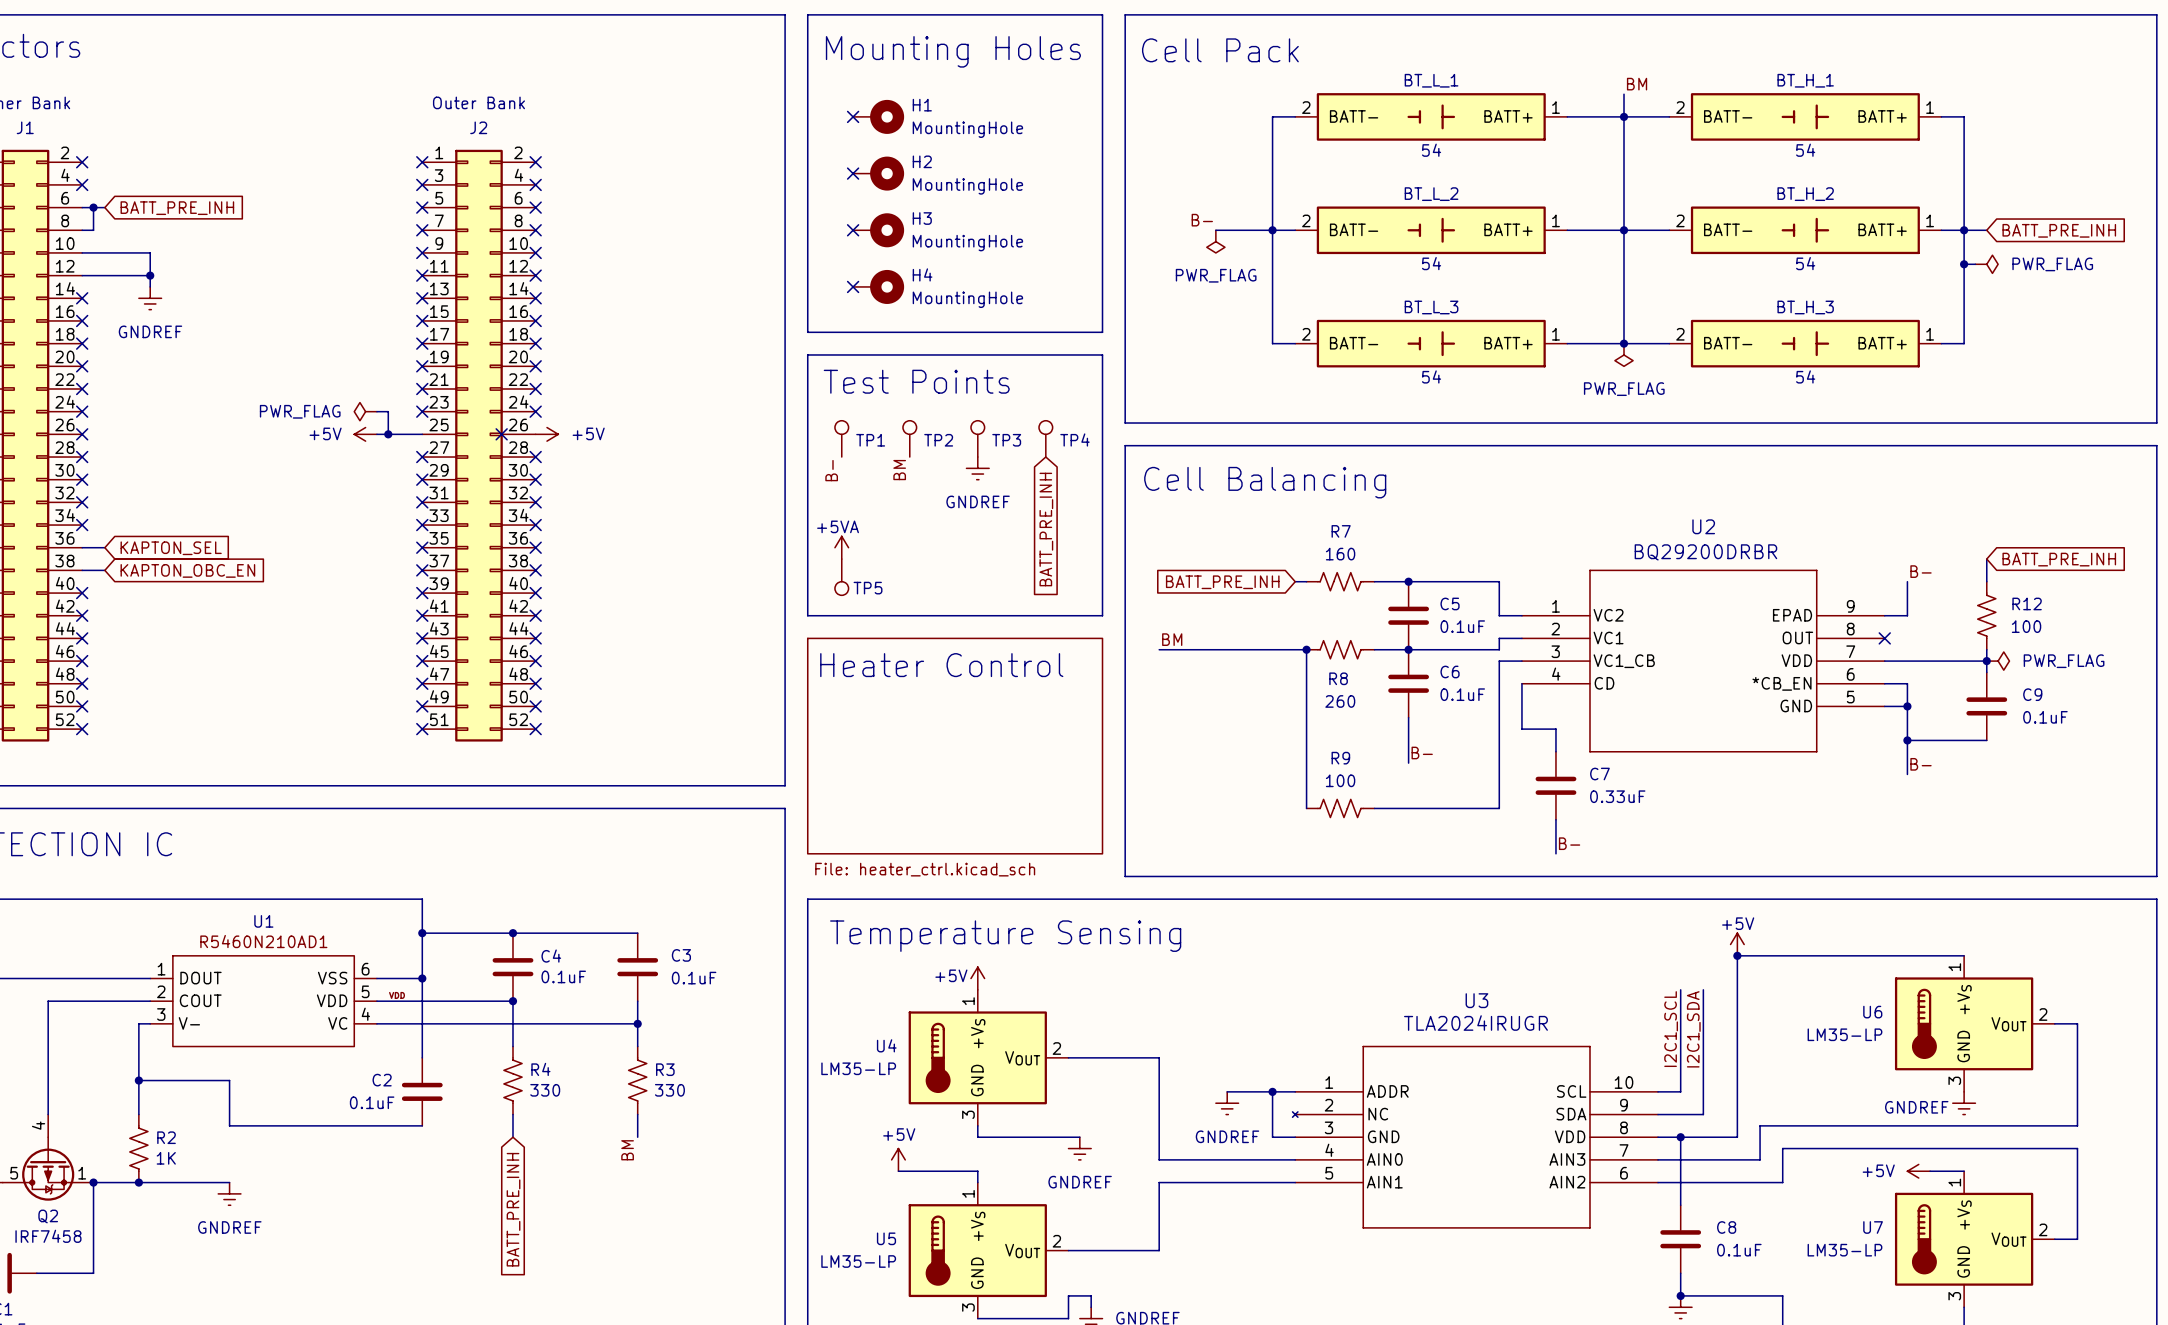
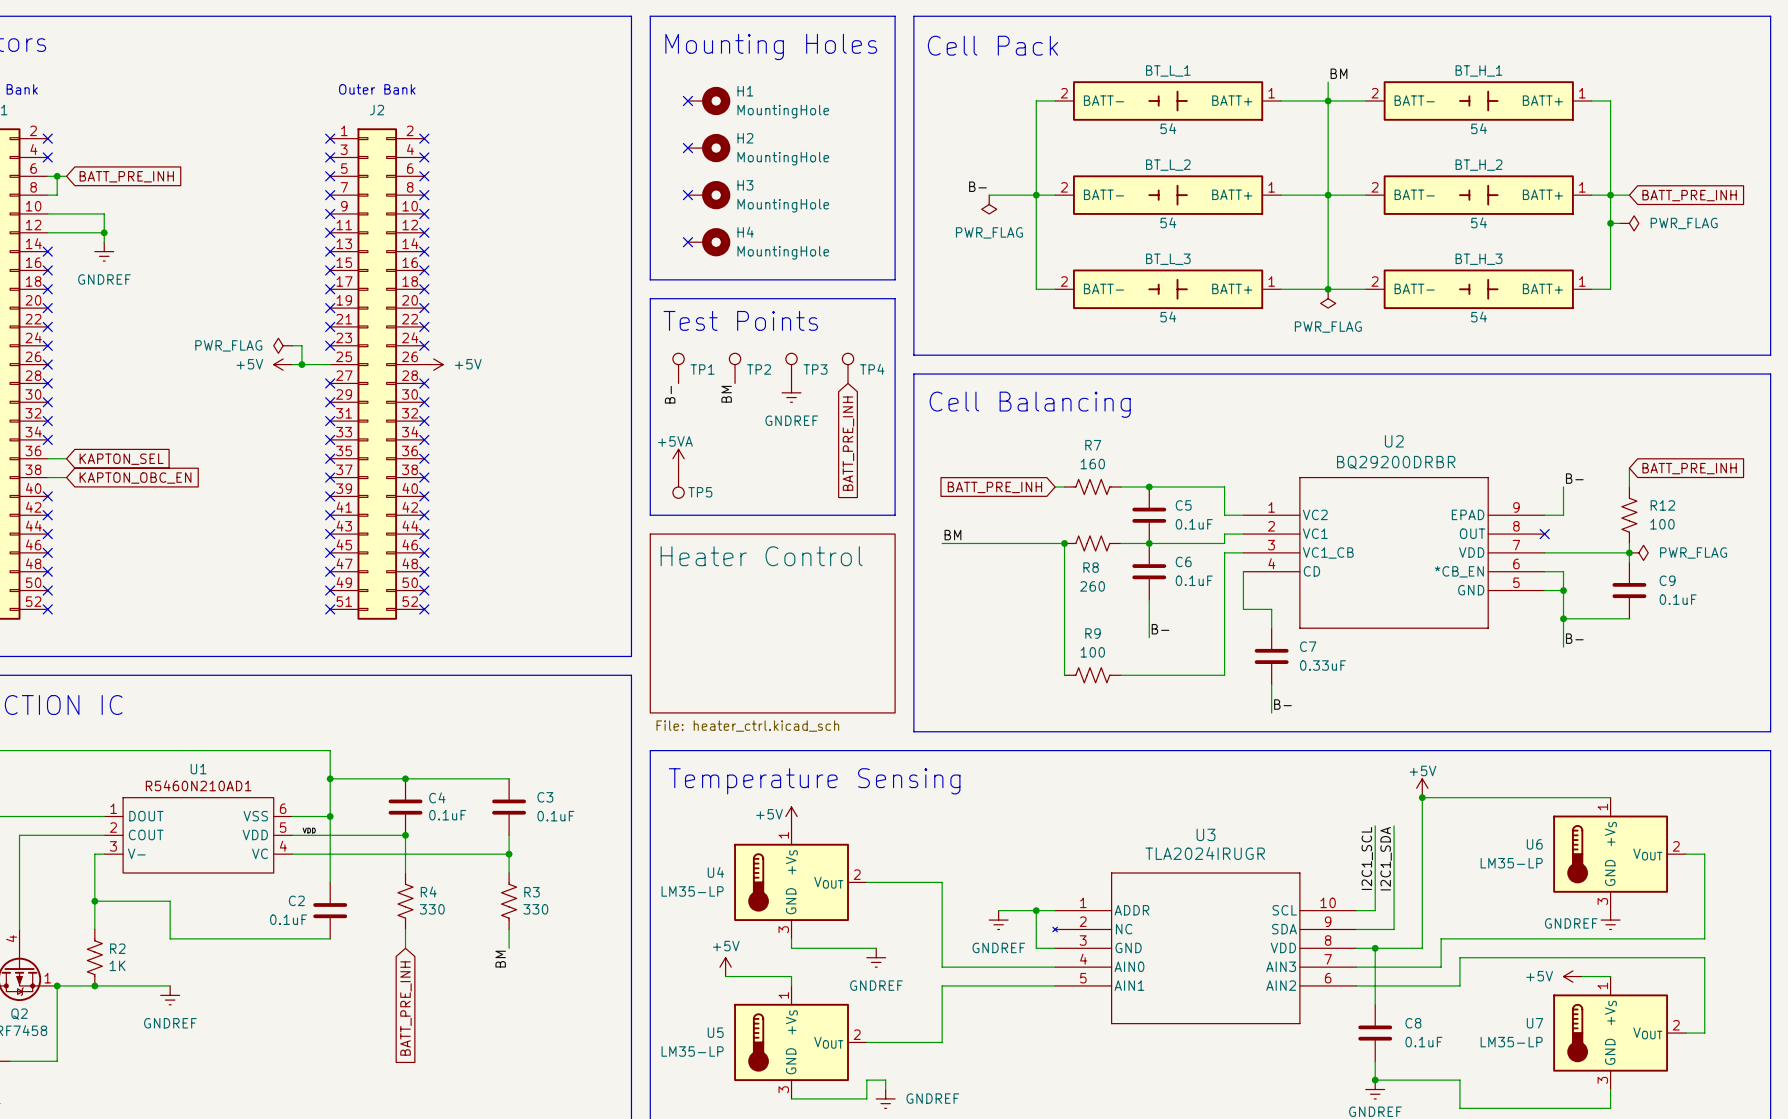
no-connect mark: (501, 434) -> none

